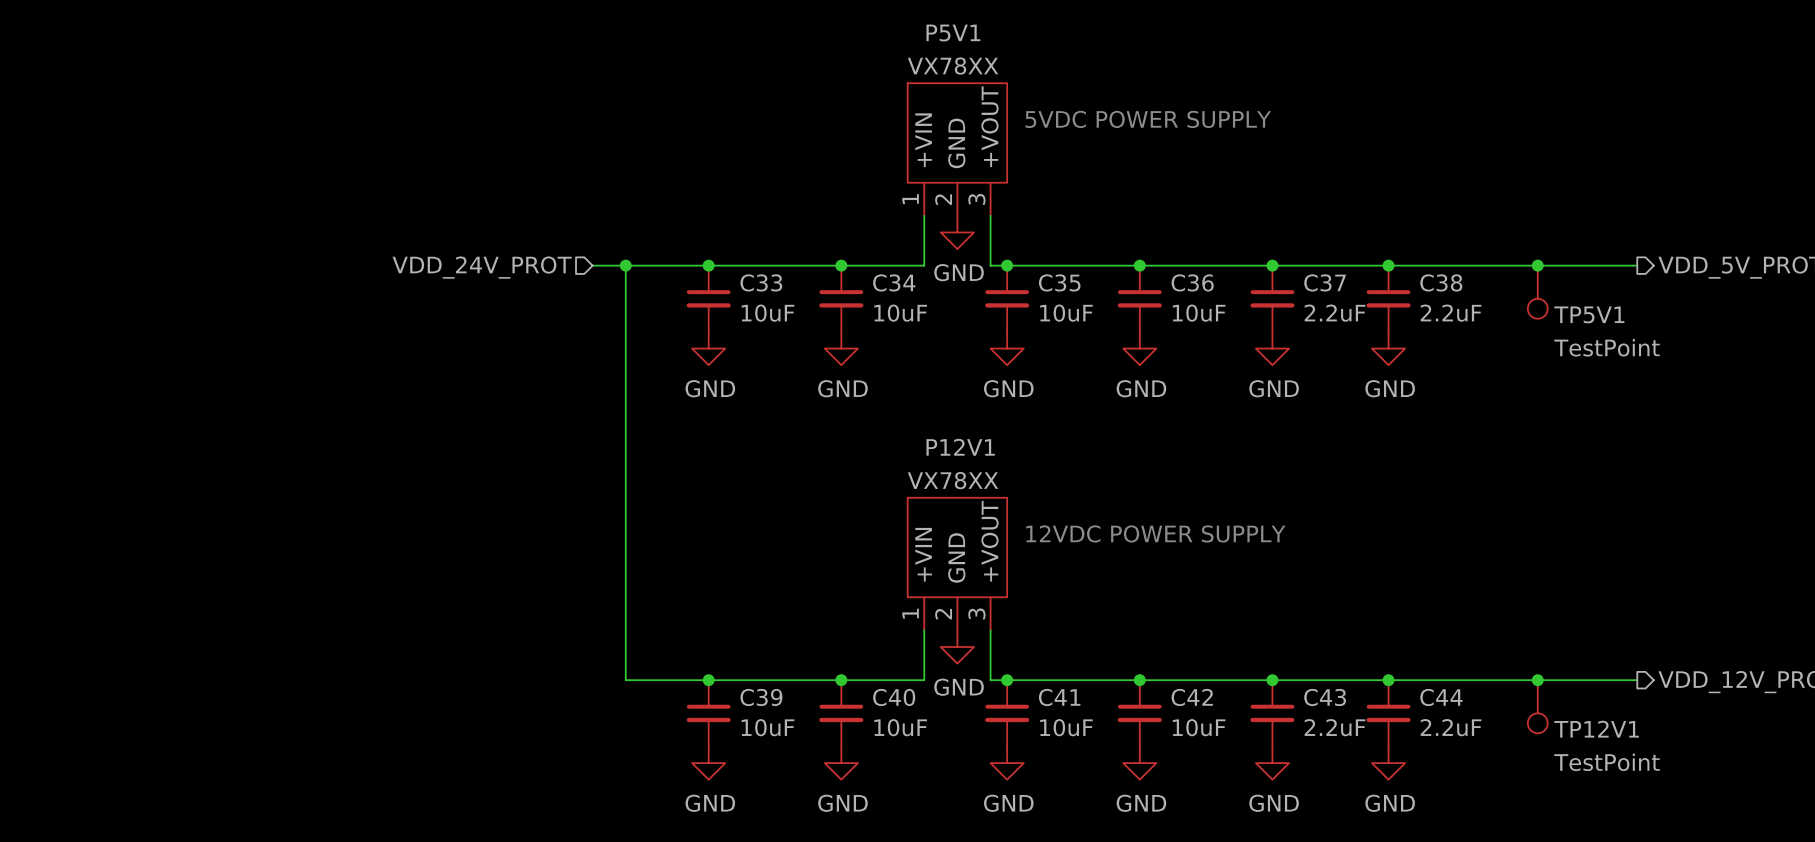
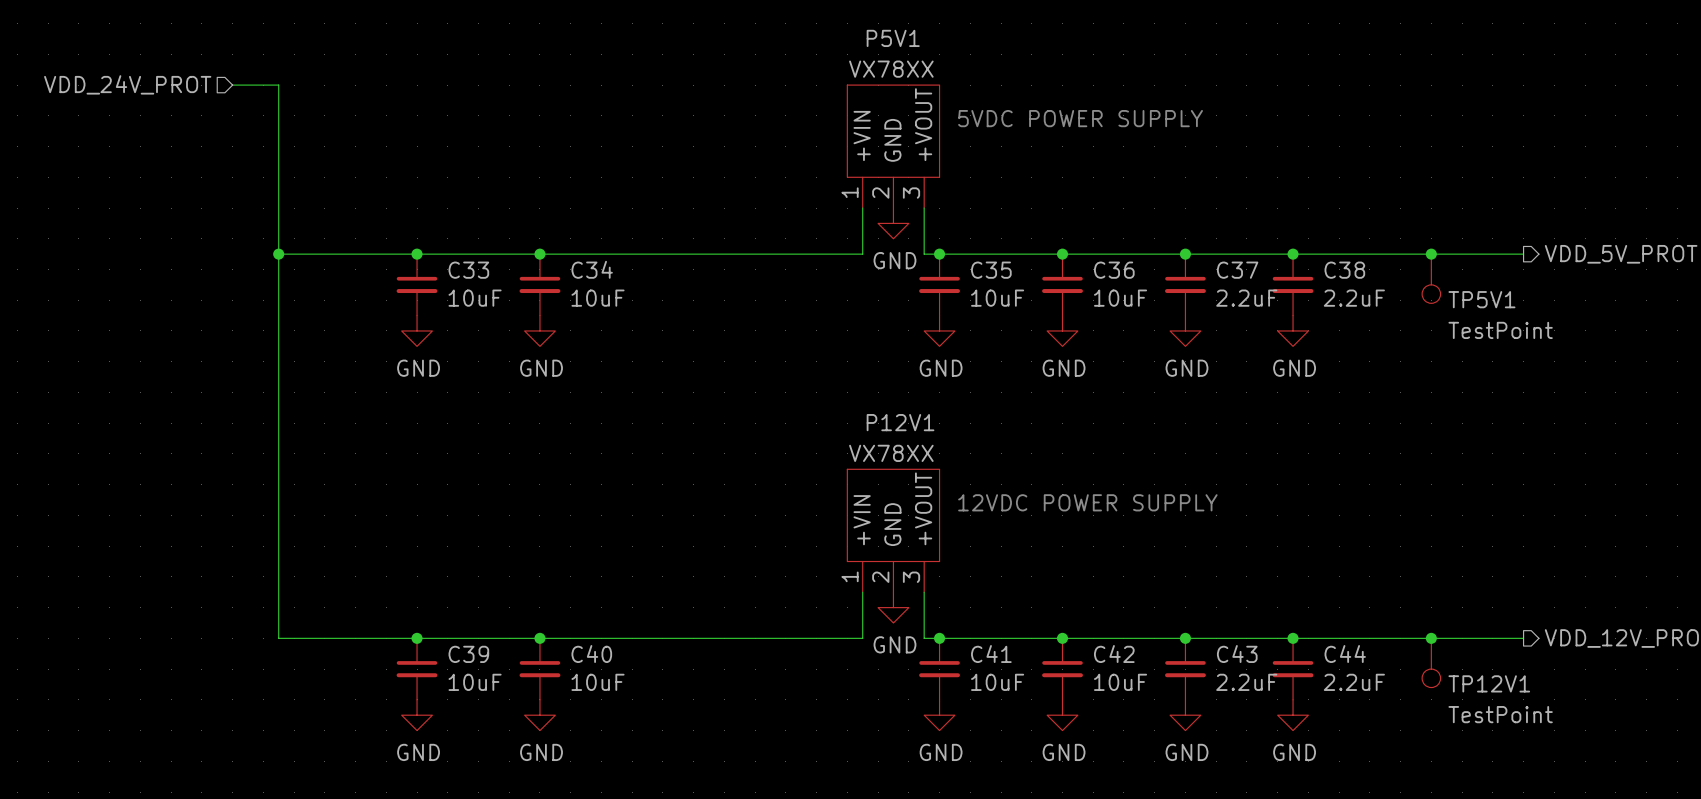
hierarchical label: none -> VDD_24V_PROT (127, 84)
wire: none -> (278, 254) (555, 254)
junction: none -> (278, 254)
junction: none -> (417, 254)
wire: (625, 265) (625, 680) -> (232, 85) (278, 85) (278, 638) (586, 638)
junction position: (625, 265) -> (539, 254)
junction: (708, 265) -> none
junction: (841, 265) -> none
hierarchical label: VDD_24V_PROT (482, 267) -> none
C33 position: (708, 298) -> (417, 284)
C34 position: (841, 298) -> (539, 284)
power symbol: none -> GND (417, 330)
power symbol: none -> GND (539, 330)
power symbol: GND (708, 348) -> none
power symbol: GND (841, 348) -> none
junction: none -> (417, 638)
junction: none -> (539, 638)
junction: (708, 680) -> none
junction: (841, 680) -> none
C39 position: (708, 713) -> (417, 669)
C40 position: (841, 713) -> (539, 669)
power symbol: none -> GND (417, 715)
power symbol: none -> GND (539, 715)
power symbol: GND (708, 763) -> none
power symbol: GND (841, 763) -> none

